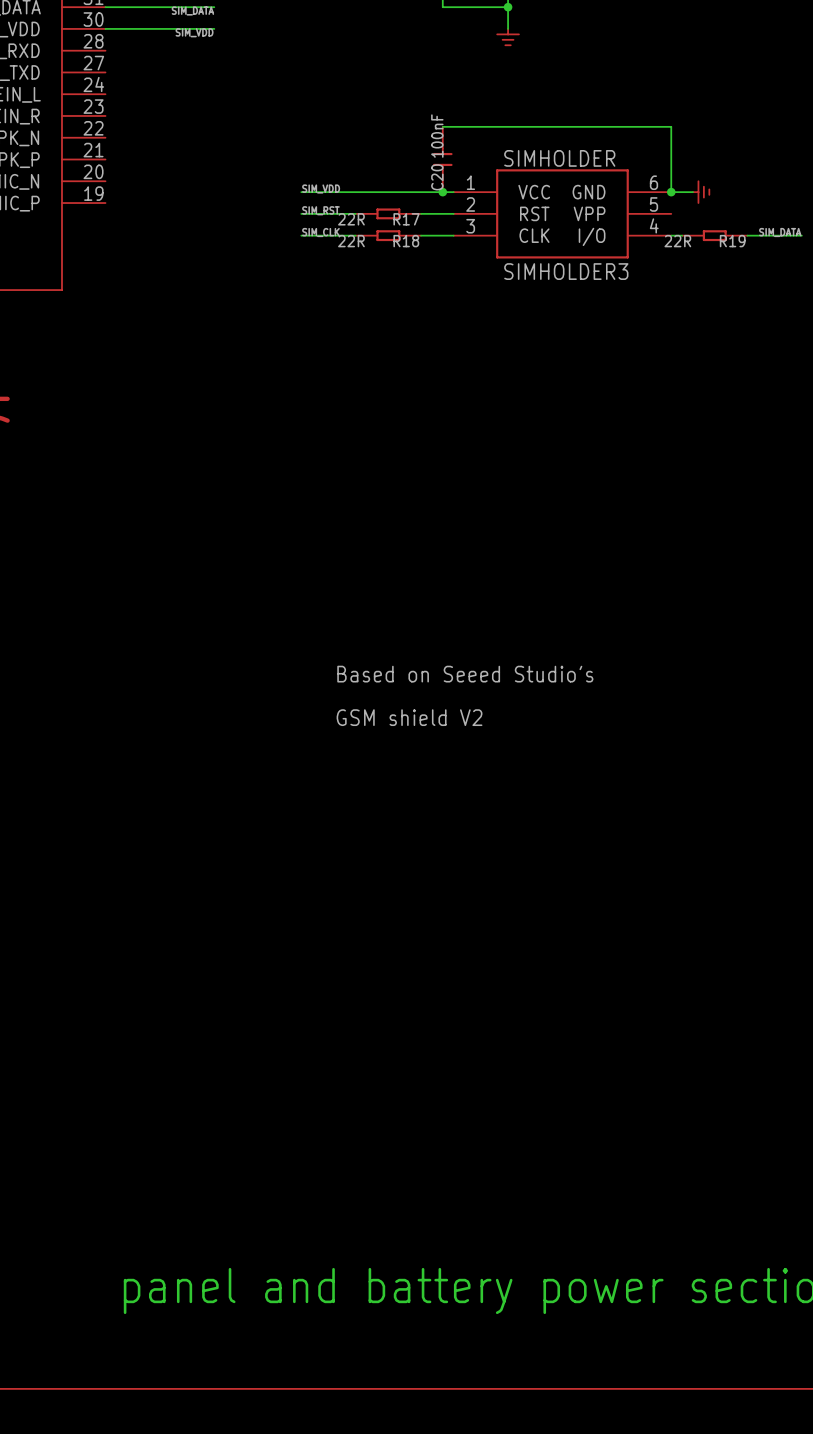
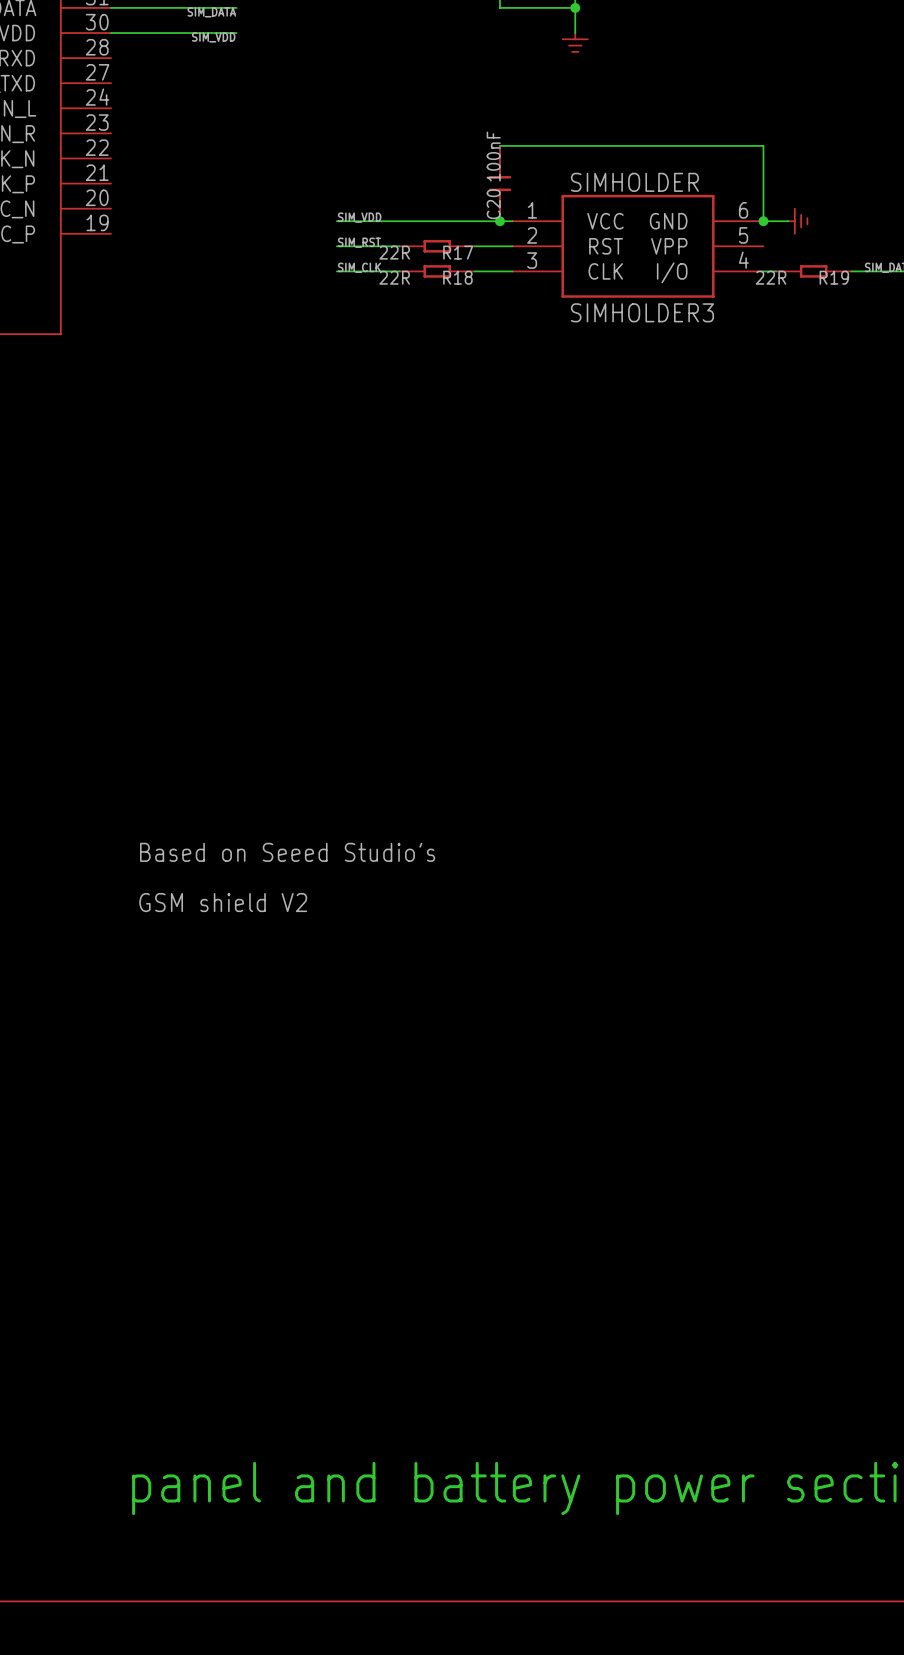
text: Based on Seeed Studio's (465, 674) -> none
text: GSM shield V2 (409, 717) -> none
text: none -> Based on Seeed Studio's (287, 852)
text: none -> GSM shield V2 (223, 902)

